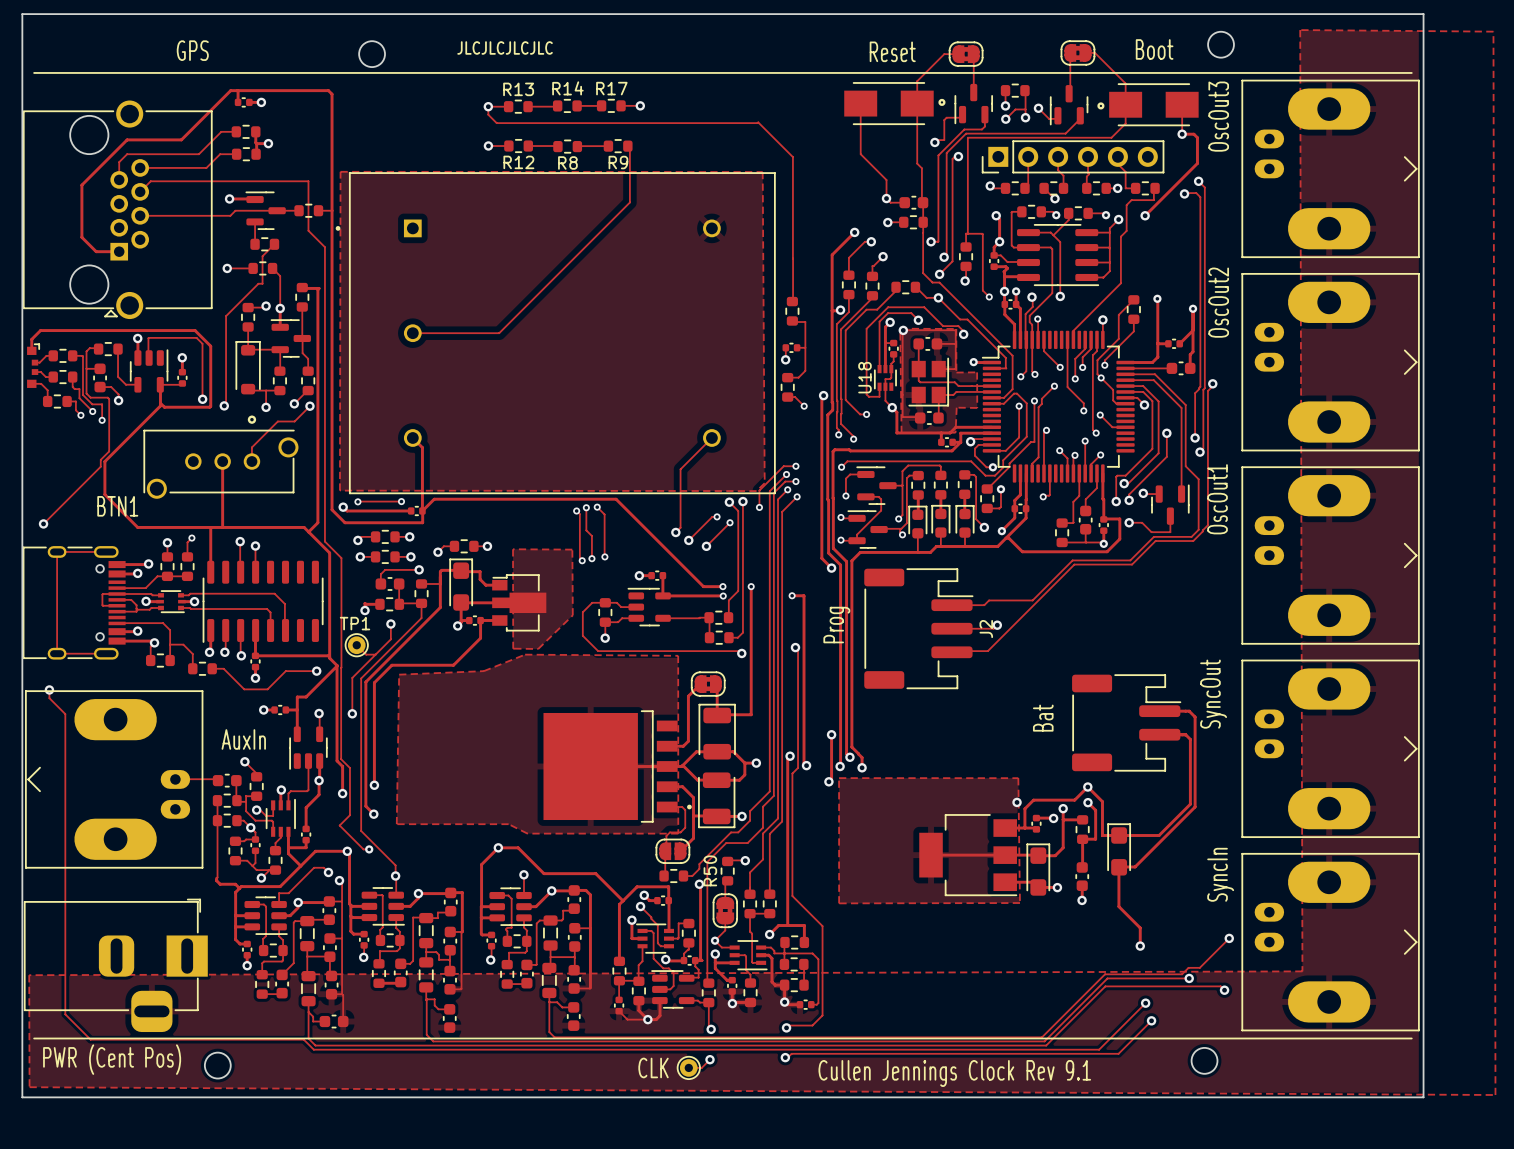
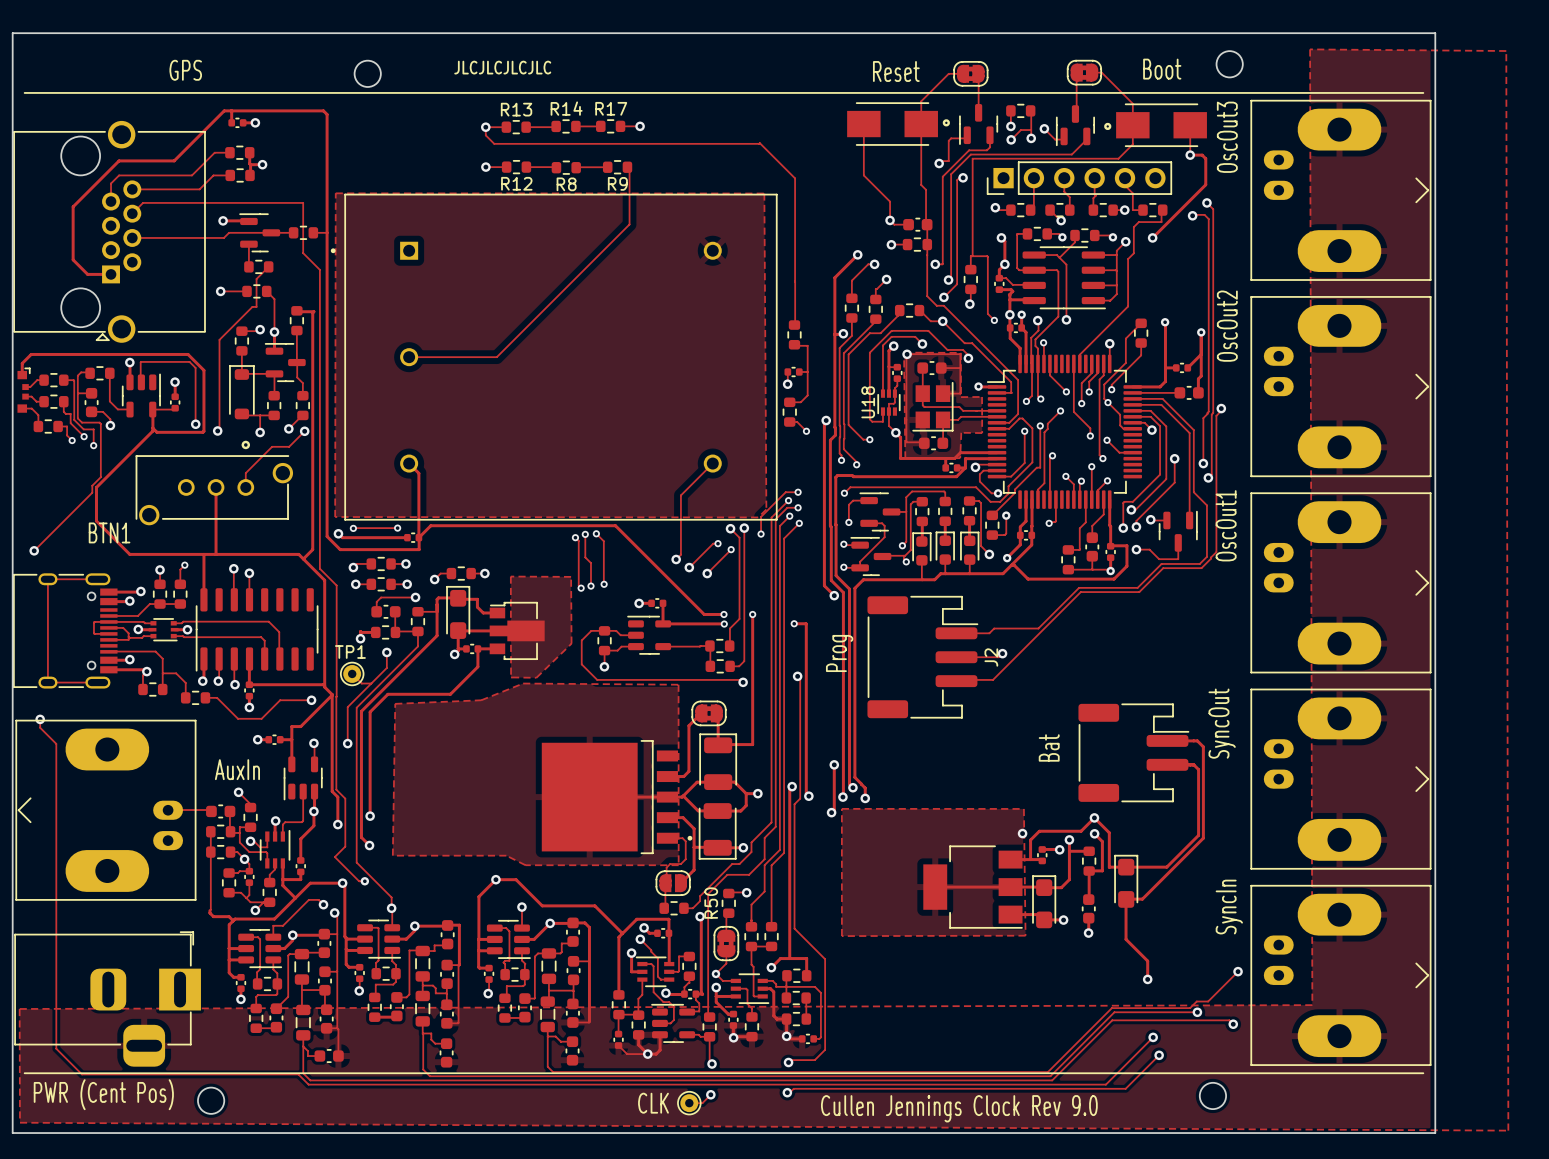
text: Cullen Jennings Clock Rev 9.1 (954, 1073) -> Cullen Jennings Clock Rev 9.0 (959, 1108)

